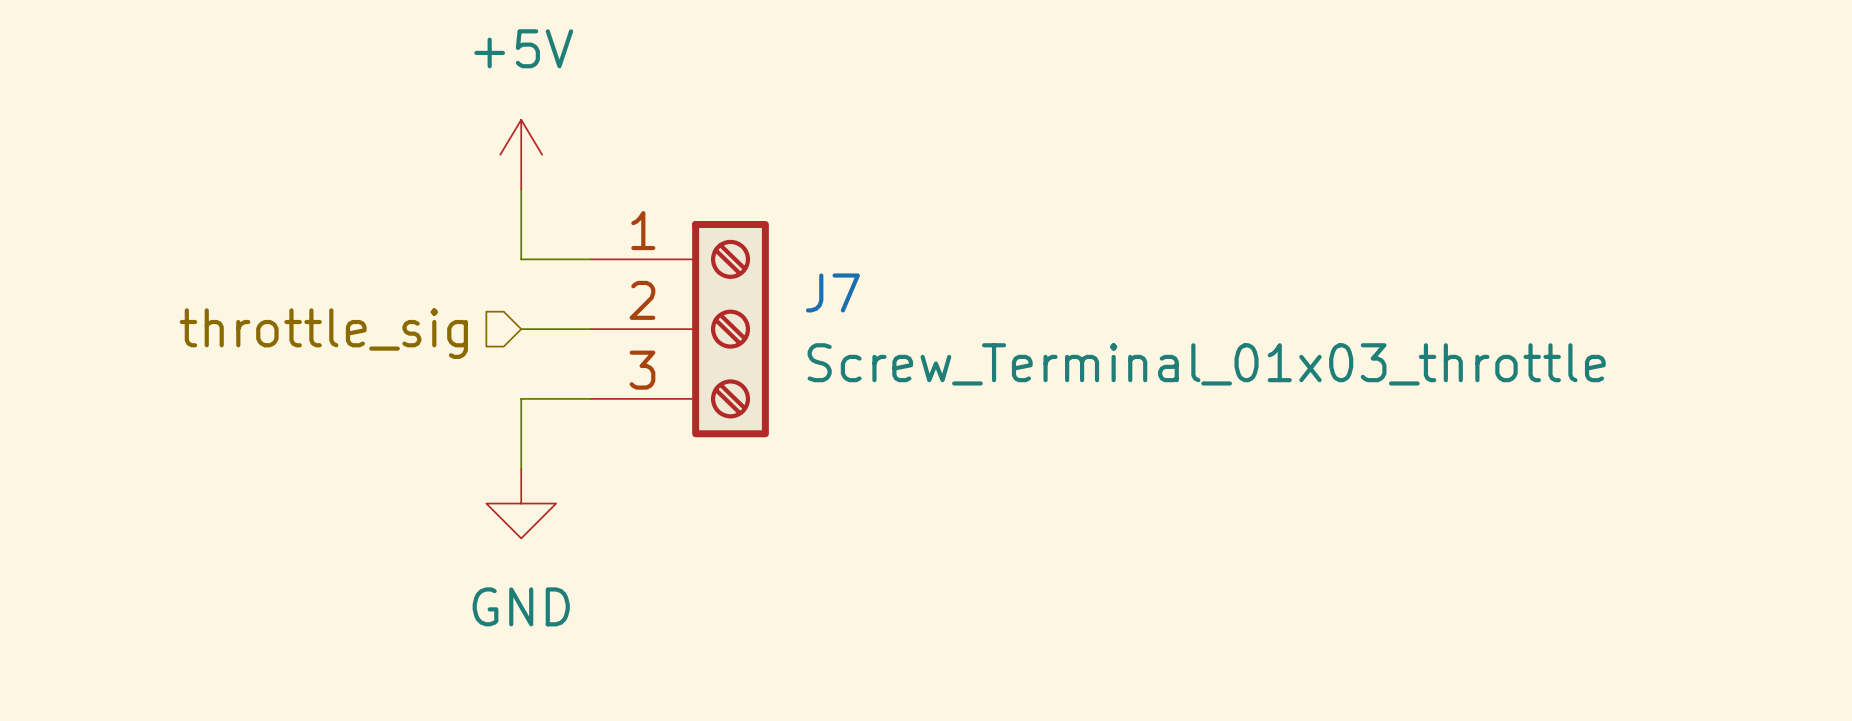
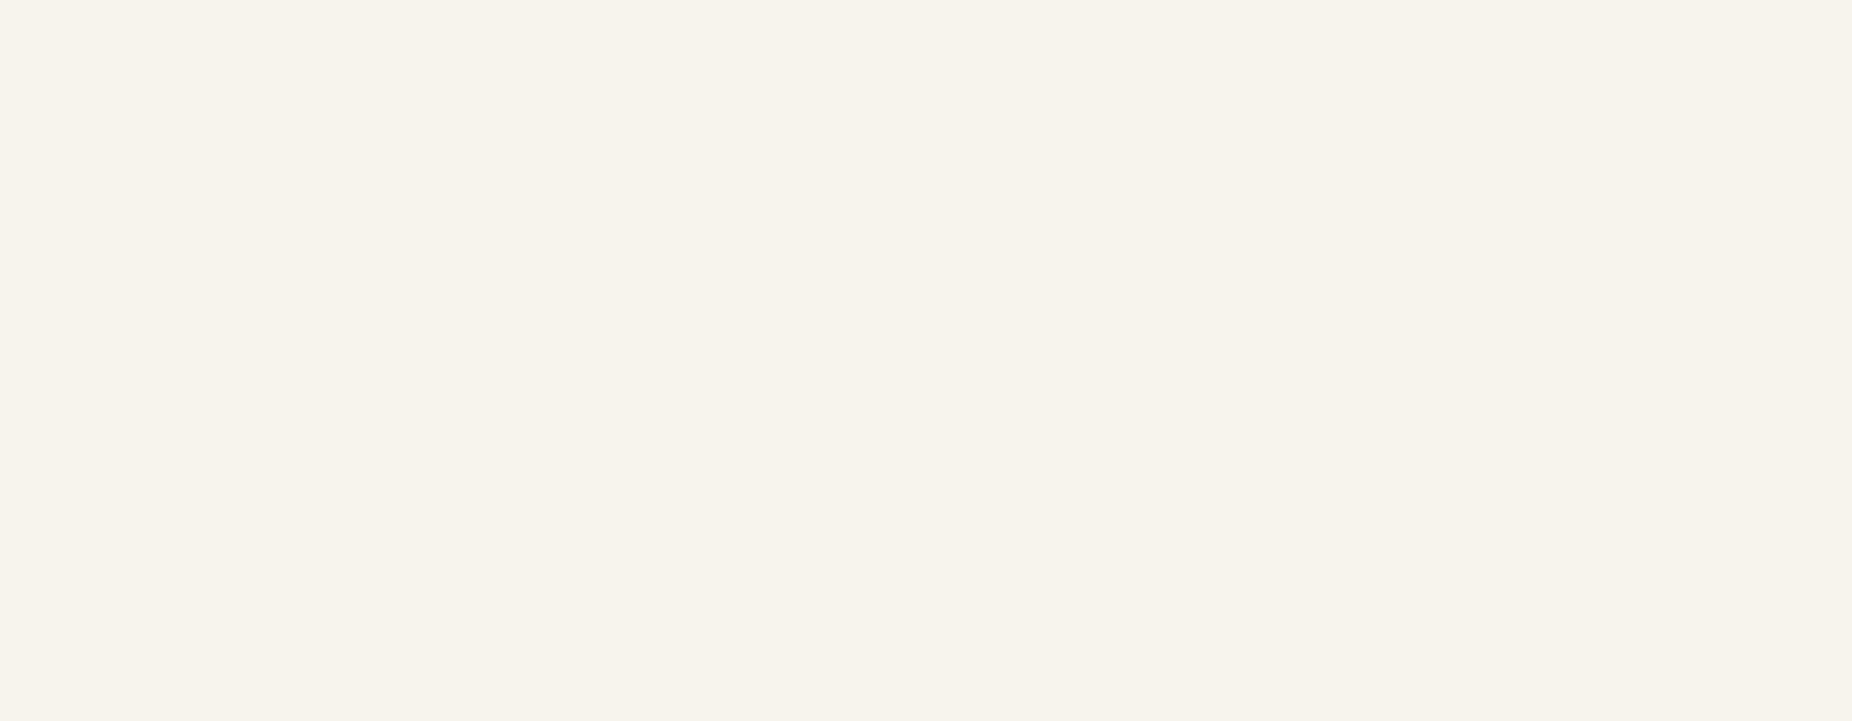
power symbol: +5V (521, 154) -> none
wire: (521, 189) (521, 259) (590, 259) -> none
wire: (521, 329) (590, 329) -> none
J7: Screw_Terminal_01x03_throttle (679, 329) -> none
hierarchical label: throttle_sig (323, 333) -> none
wire: (590, 398) (521, 398) (521, 468) -> none
power symbol: GND (521, 503) -> none

